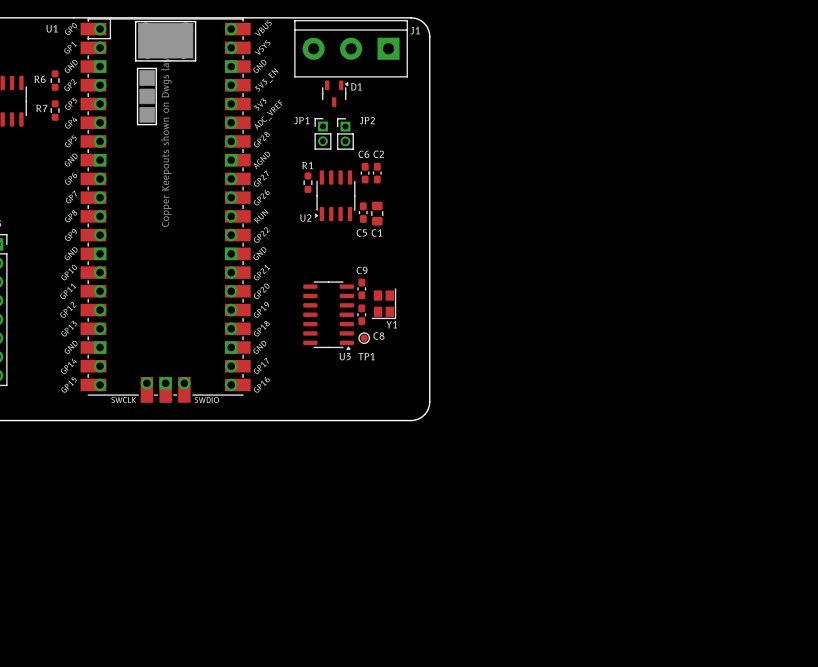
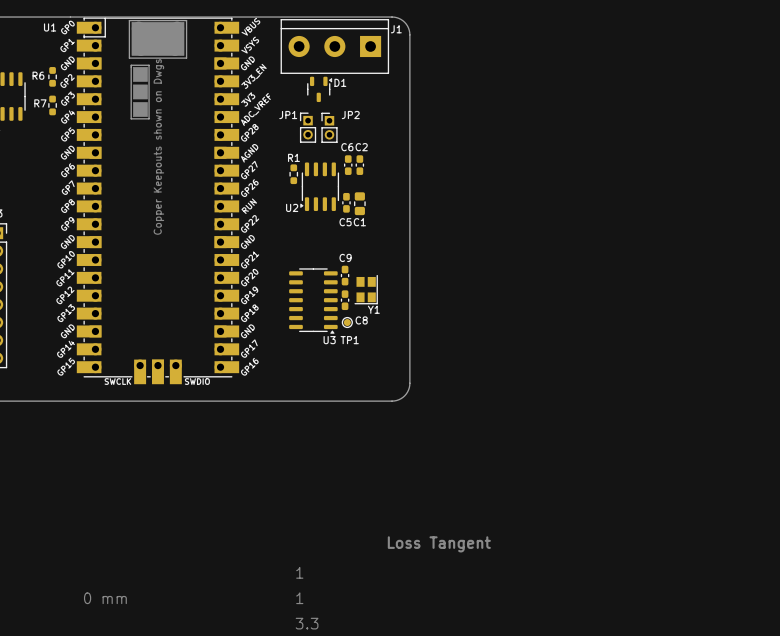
text: none -> Loss Tangent (439, 544)
text: none -> 1 (299, 572)
text: none -> 0 mm (105, 598)
text: none -> 1 (299, 598)
text: none -> 3.3 (307, 623)

